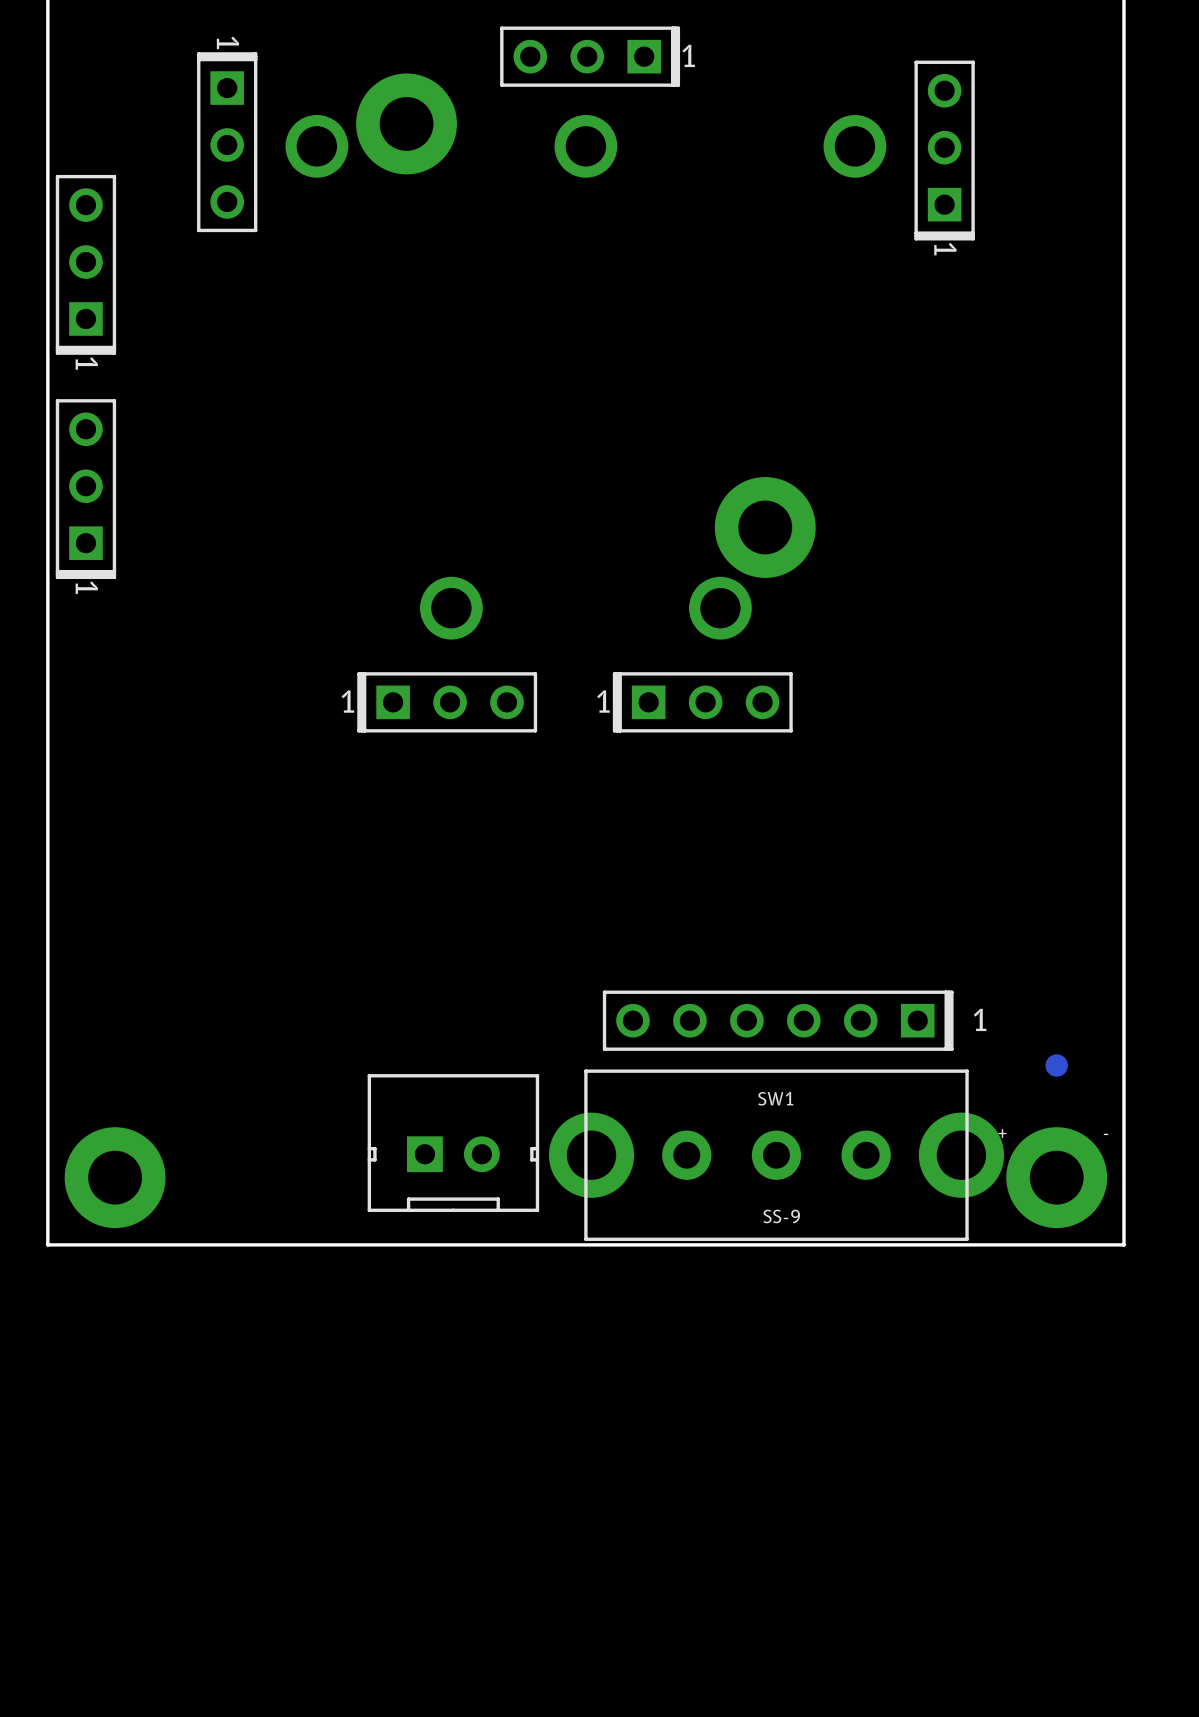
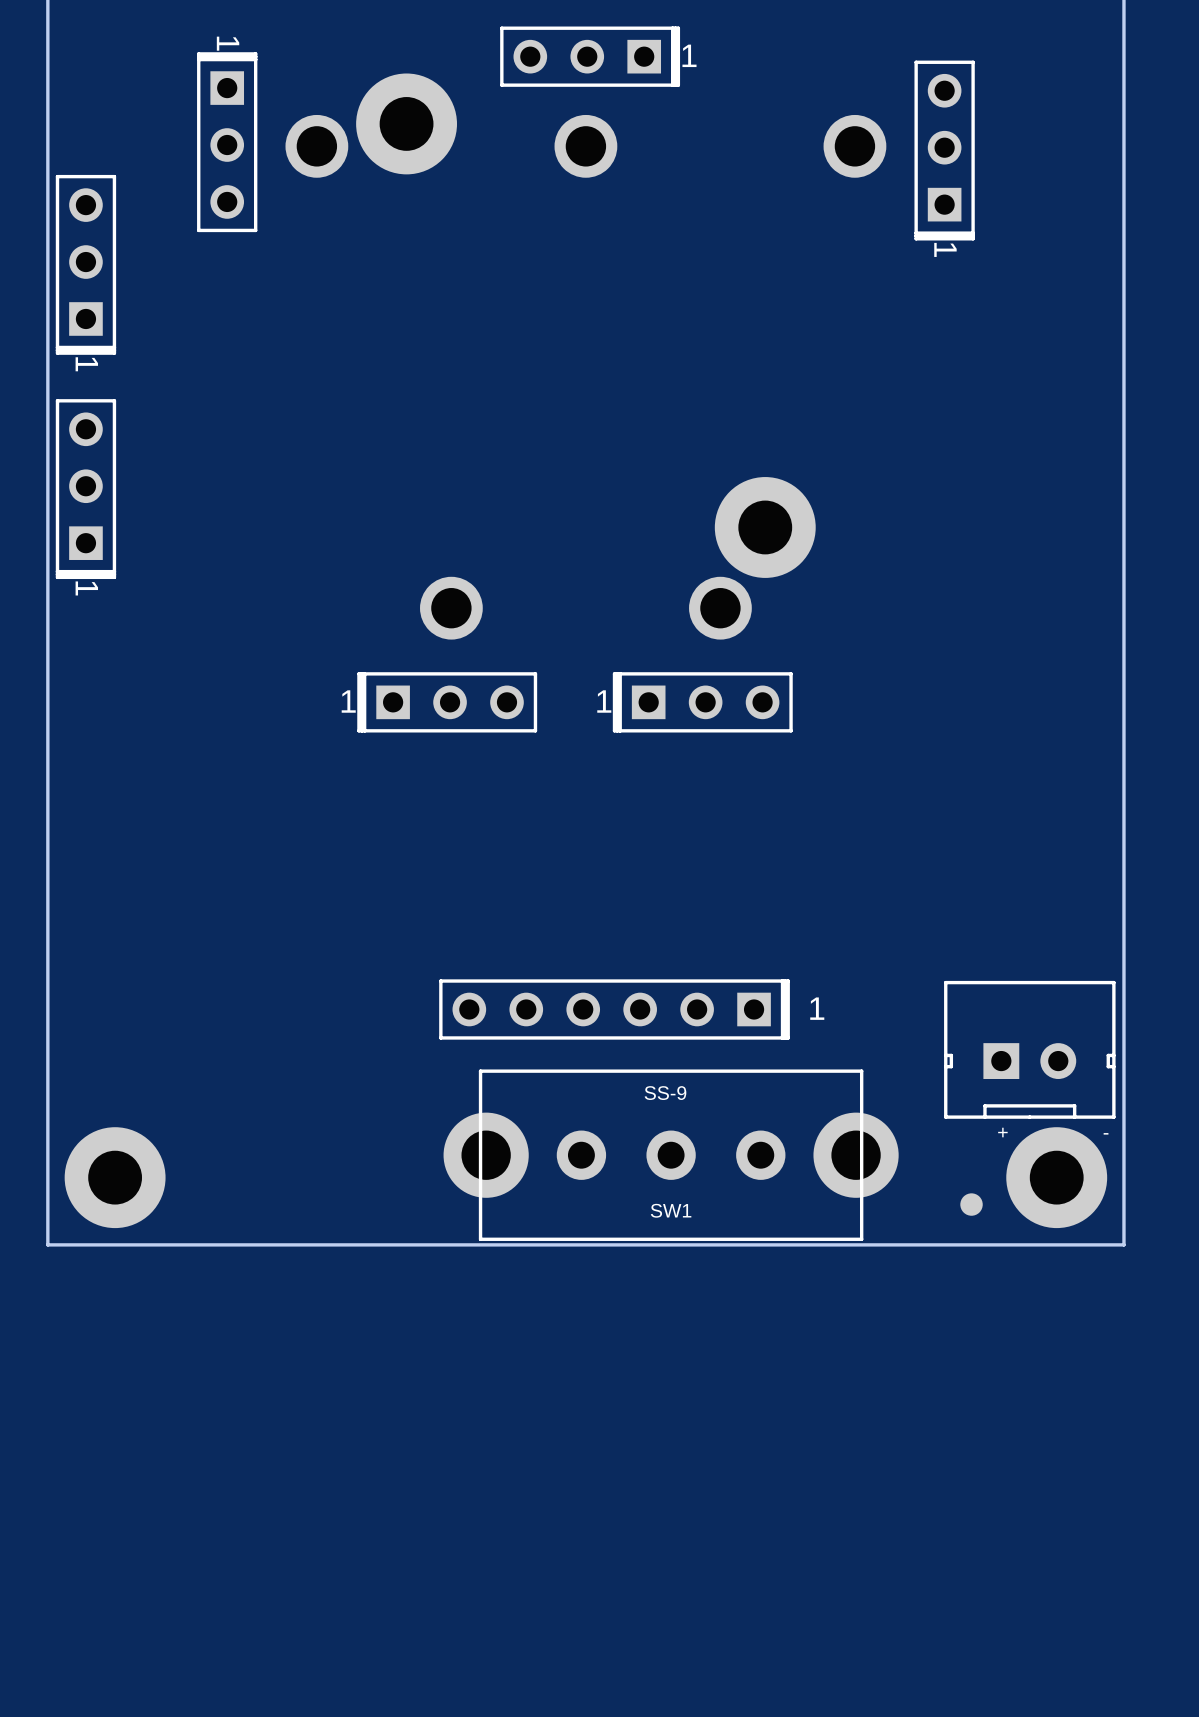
part position: (778, 1020) -> (614, 1009)
part: none -> (1029, 1049)
part position: (1056, 1065) -> (971, 1204)
SW1 name position: SW1 (775, 1098) -> SW1 (671, 1210)
part: (453, 1143) -> none
SW1 position: (776, 1155) -> (671, 1155)
SW1 value position: SS-9 (781, 1216) -> SS-9 (665, 1093)

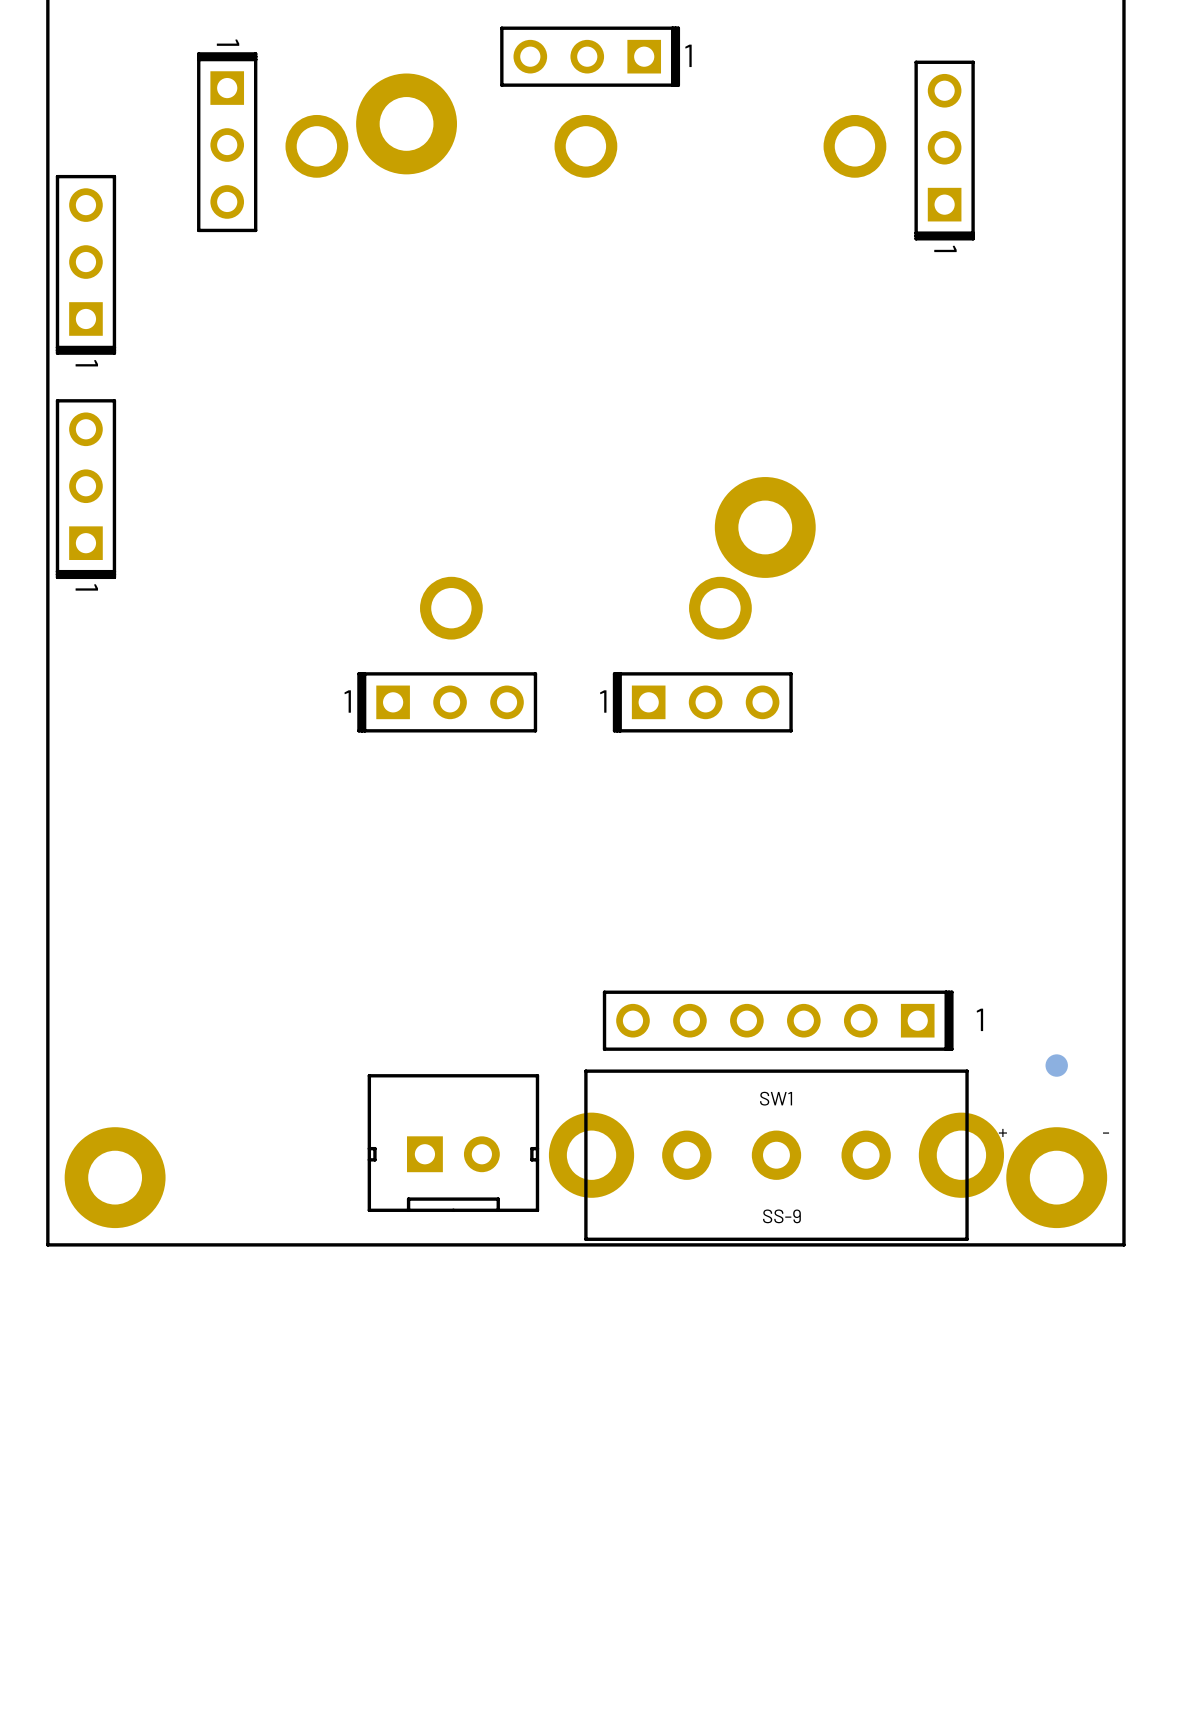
part position: (614, 1009) -> (778, 1020)
part: (1029, 1049) -> none
SW1 value position: SS-9 (665, 1093) -> SS-9 (781, 1216)
part: none -> (453, 1143)
SW1 position: (671, 1155) -> (776, 1155)
part position: (971, 1204) -> (1056, 1065)
SW1 name position: SW1 (671, 1210) -> SW1 (776, 1098)

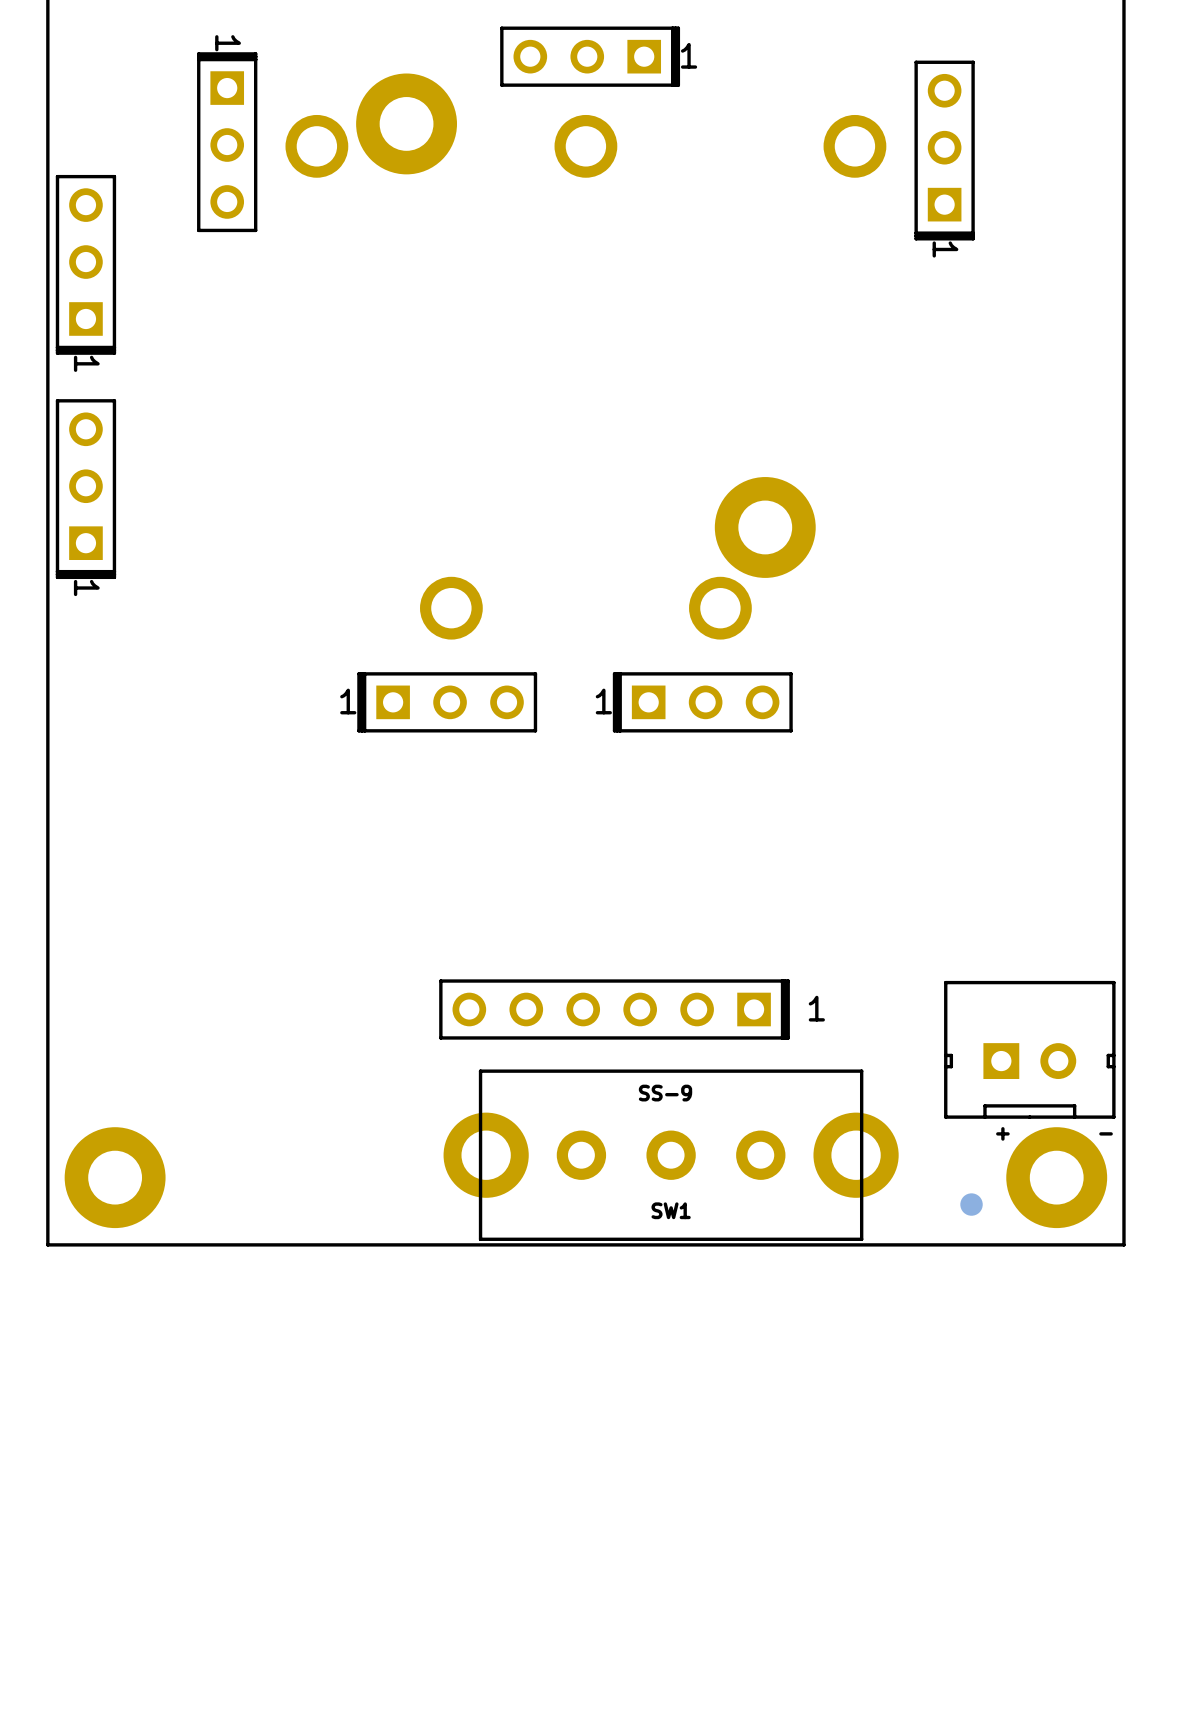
part position: (778, 1020) -> (614, 1009)
part: none -> (1029, 1049)
part position: (1056, 1065) -> (971, 1204)
SW1 name position: SW1 (776, 1098) -> SW1 (671, 1210)
part: (453, 1143) -> none
SW1 position: (776, 1155) -> (671, 1155)
SW1 value position: SS-9 (781, 1216) -> SS-9 (665, 1093)

